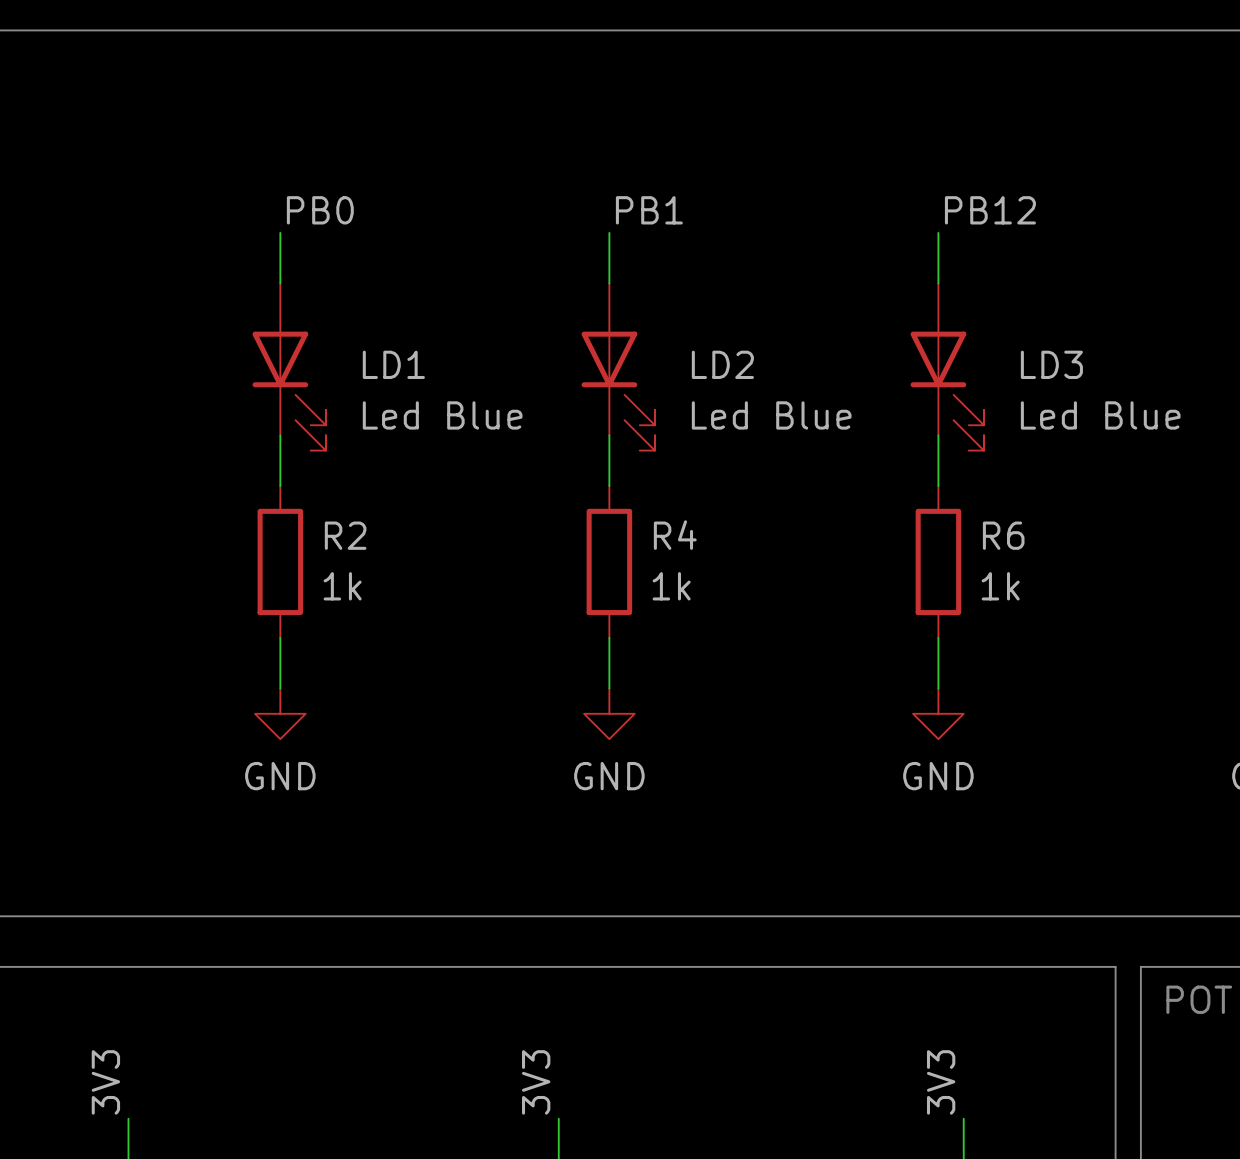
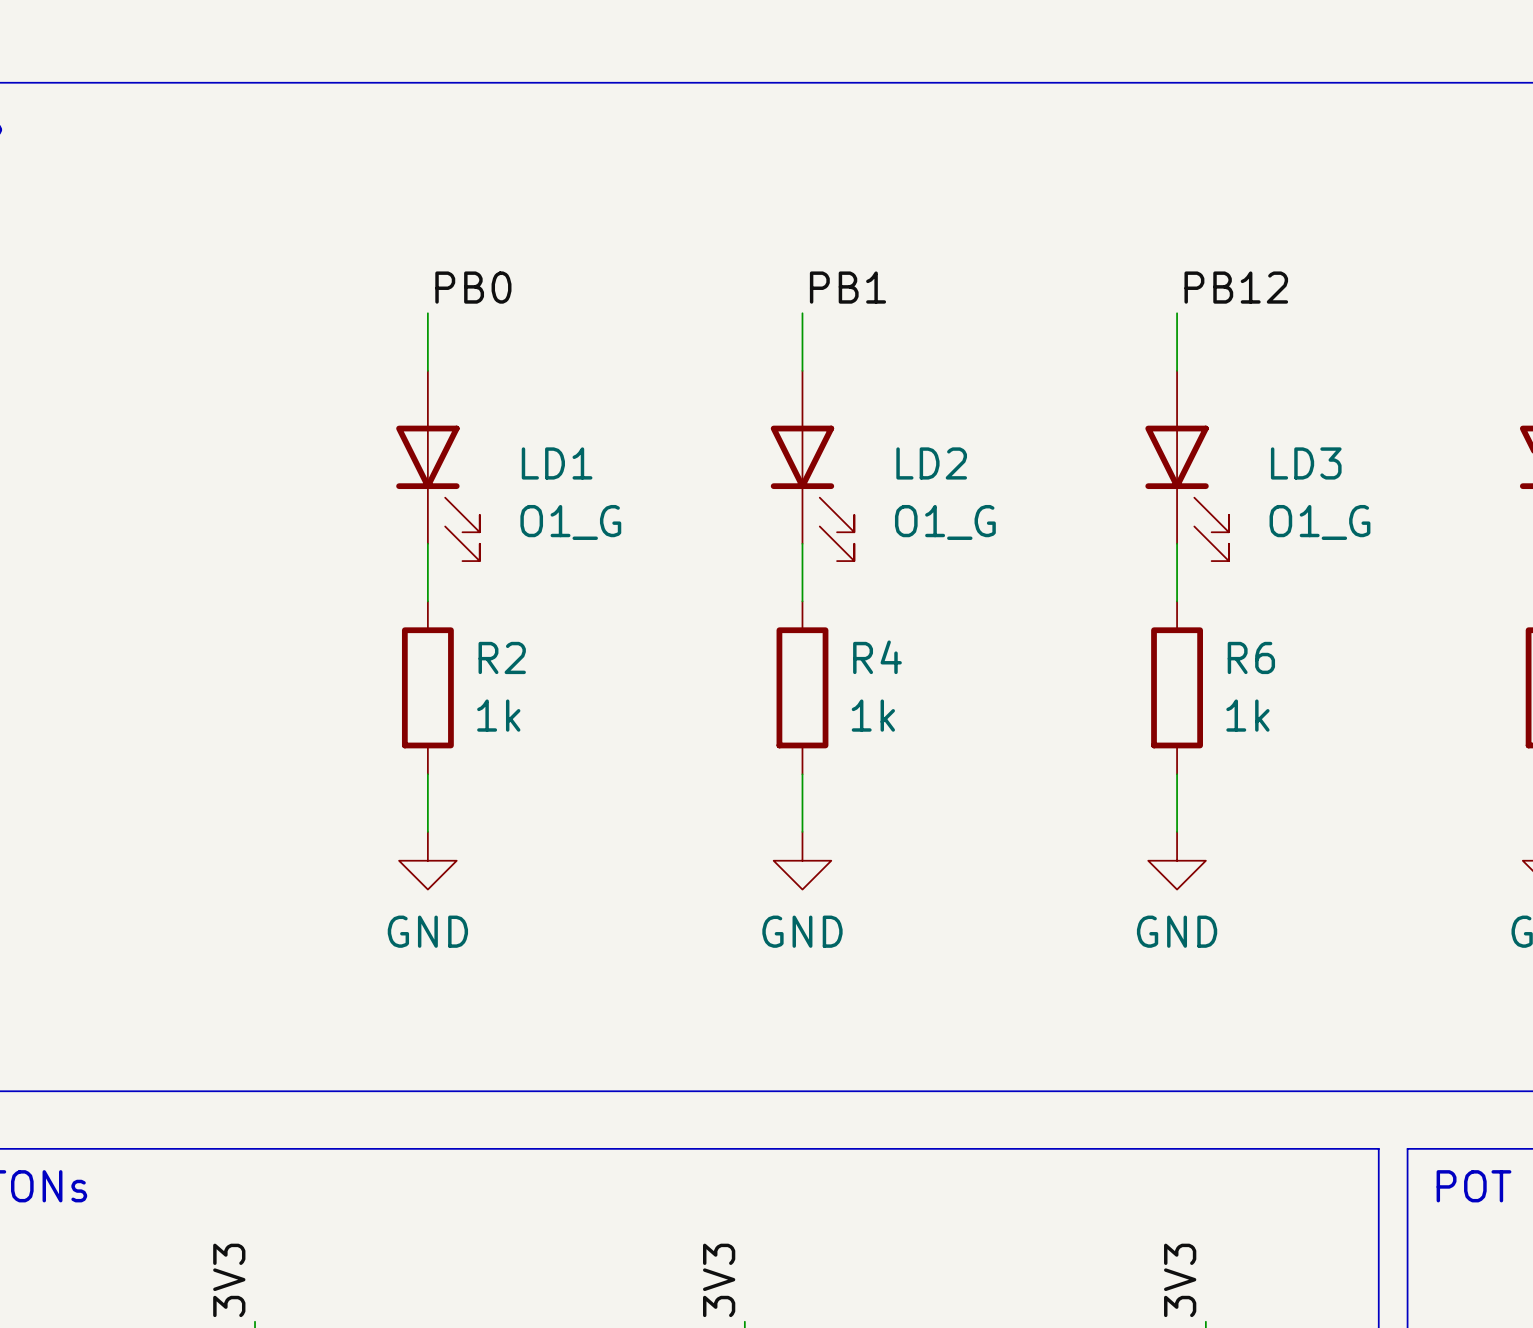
LD1 value: Led Blue (442, 415) -> O1_G (570, 522)
LD2 value: Led Blue (771, 415) -> O1_G (945, 522)
LD3 value: Led Blue (1100, 415) -> O1_G (1319, 522)

